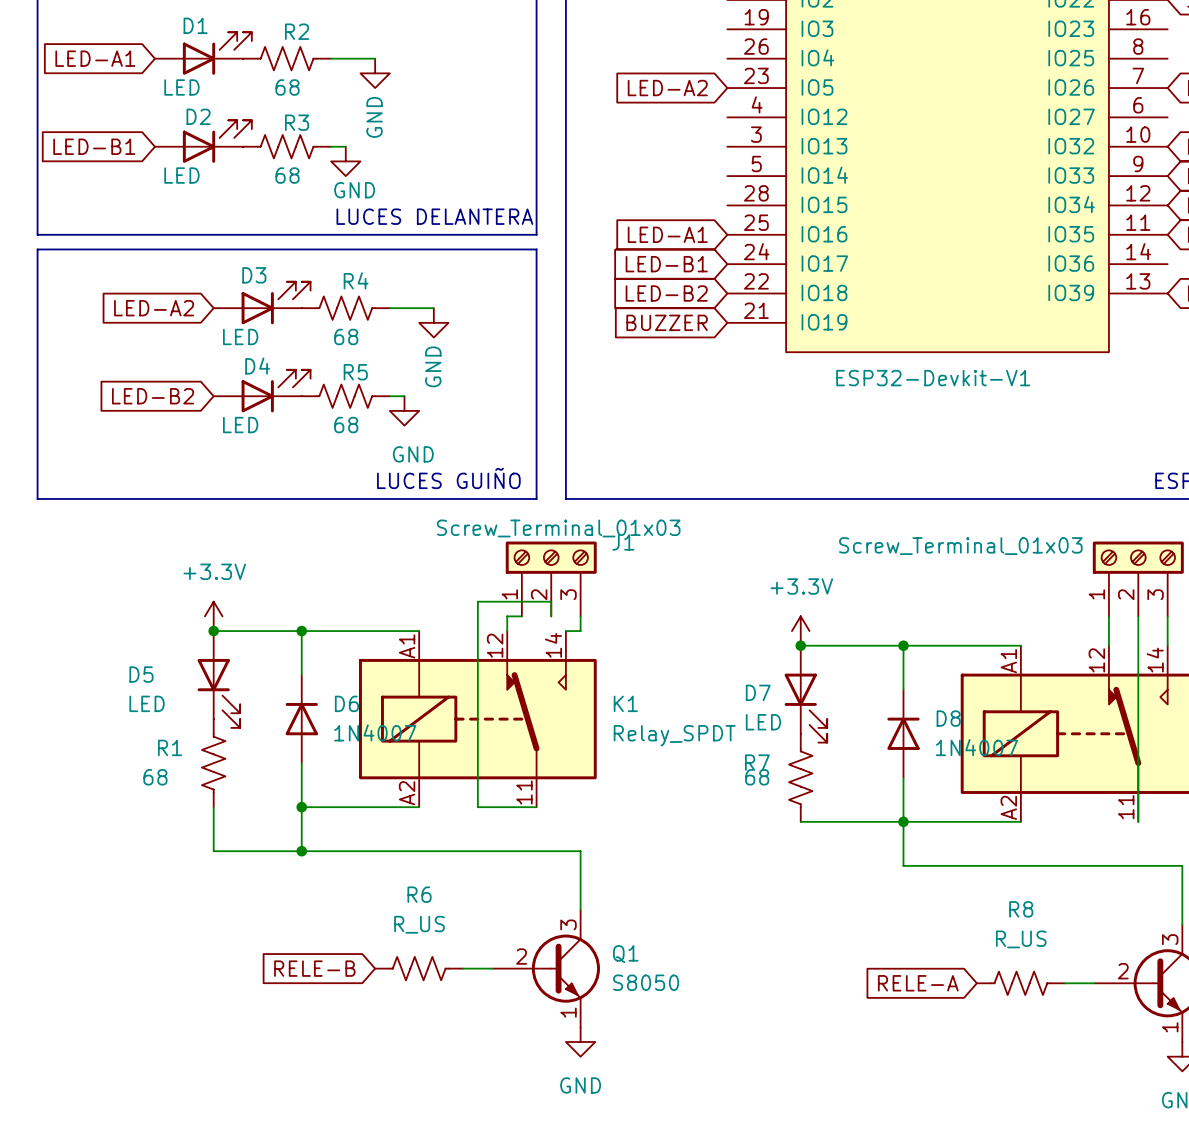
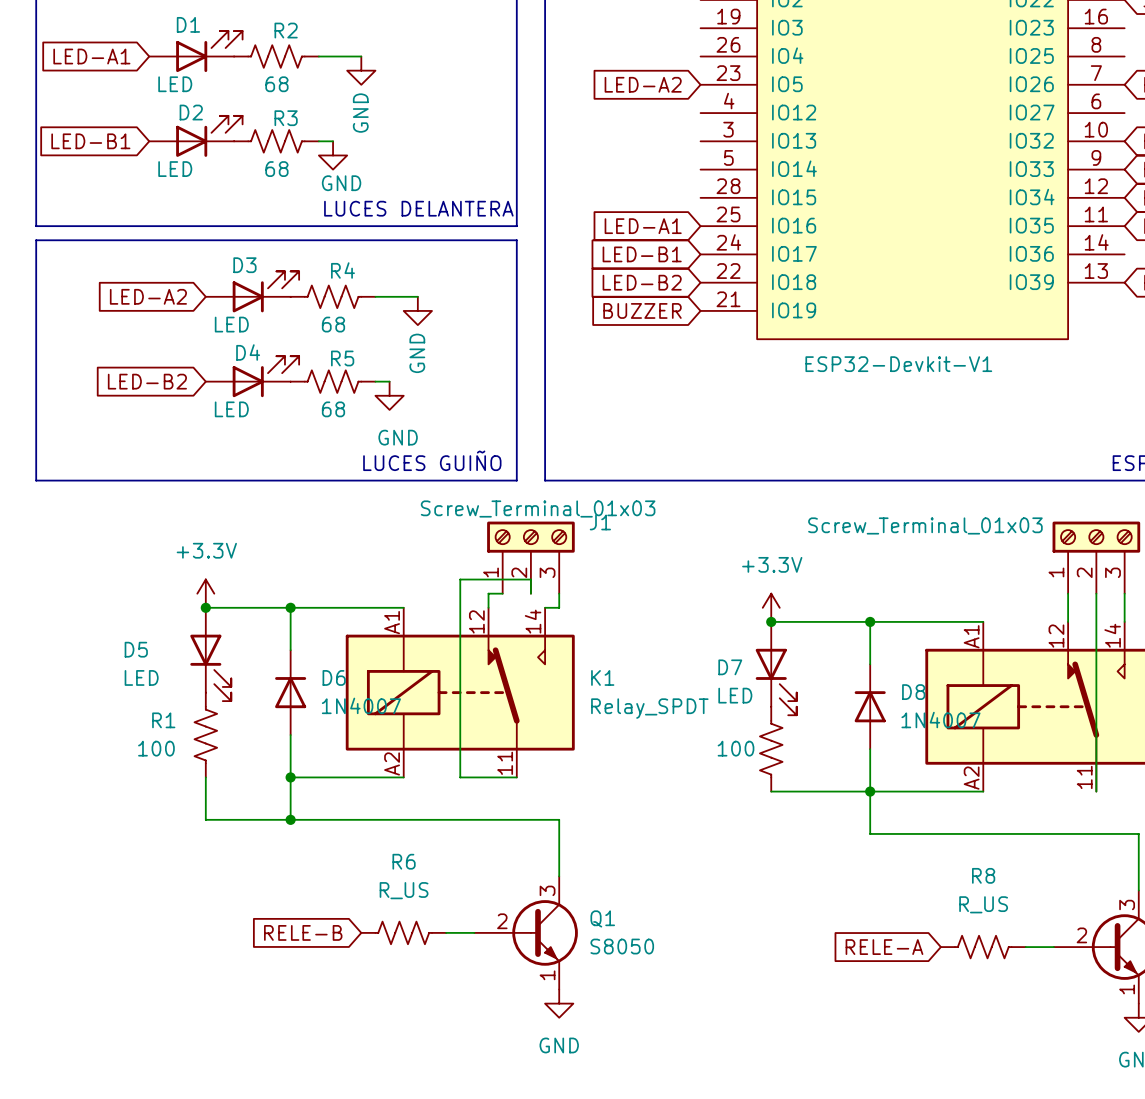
R7 name: R7 (757, 762) -> none
R1 value: 68 (155, 777) -> 100 (156, 748)
R7 value: 68 (757, 777) -> 100 (736, 748)

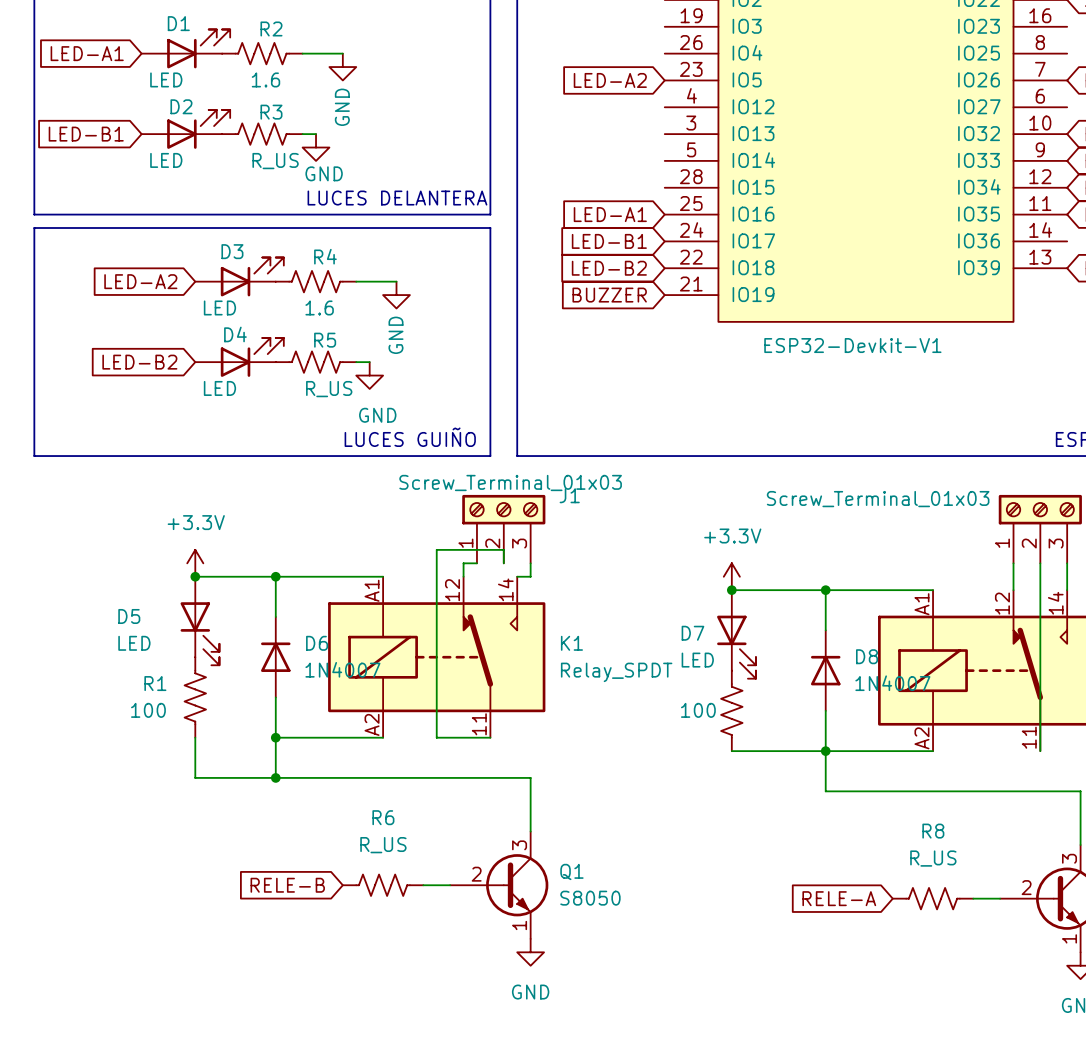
R2 value: 68 (276, 84) -> 1.6 (265, 79)
R3 value: 68 (276, 169) -> R_US (275, 161)
R4 value: 68 (333, 324) -> 1.6 (319, 307)
R5 value: 68 (333, 409) -> R_US (329, 389)

